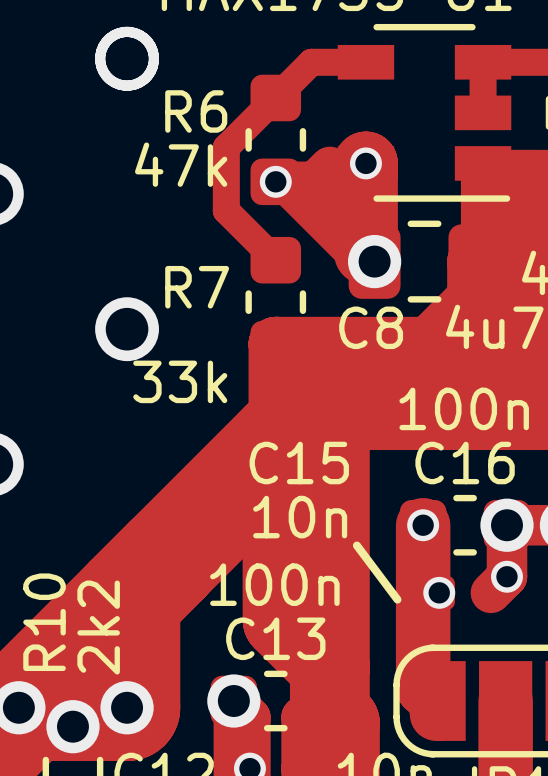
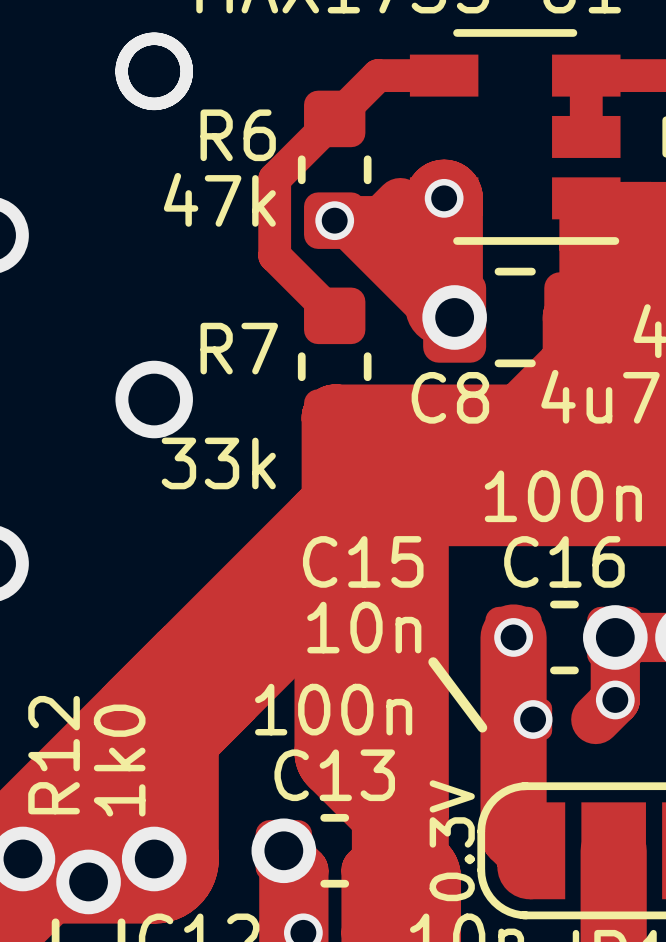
R10 name: R10 (44, 622) -> R12 (54, 755)
R10 value: 2k2 (98, 627) -> 1k0 (119, 760)
text: none -> 0.3V (452, 840)

